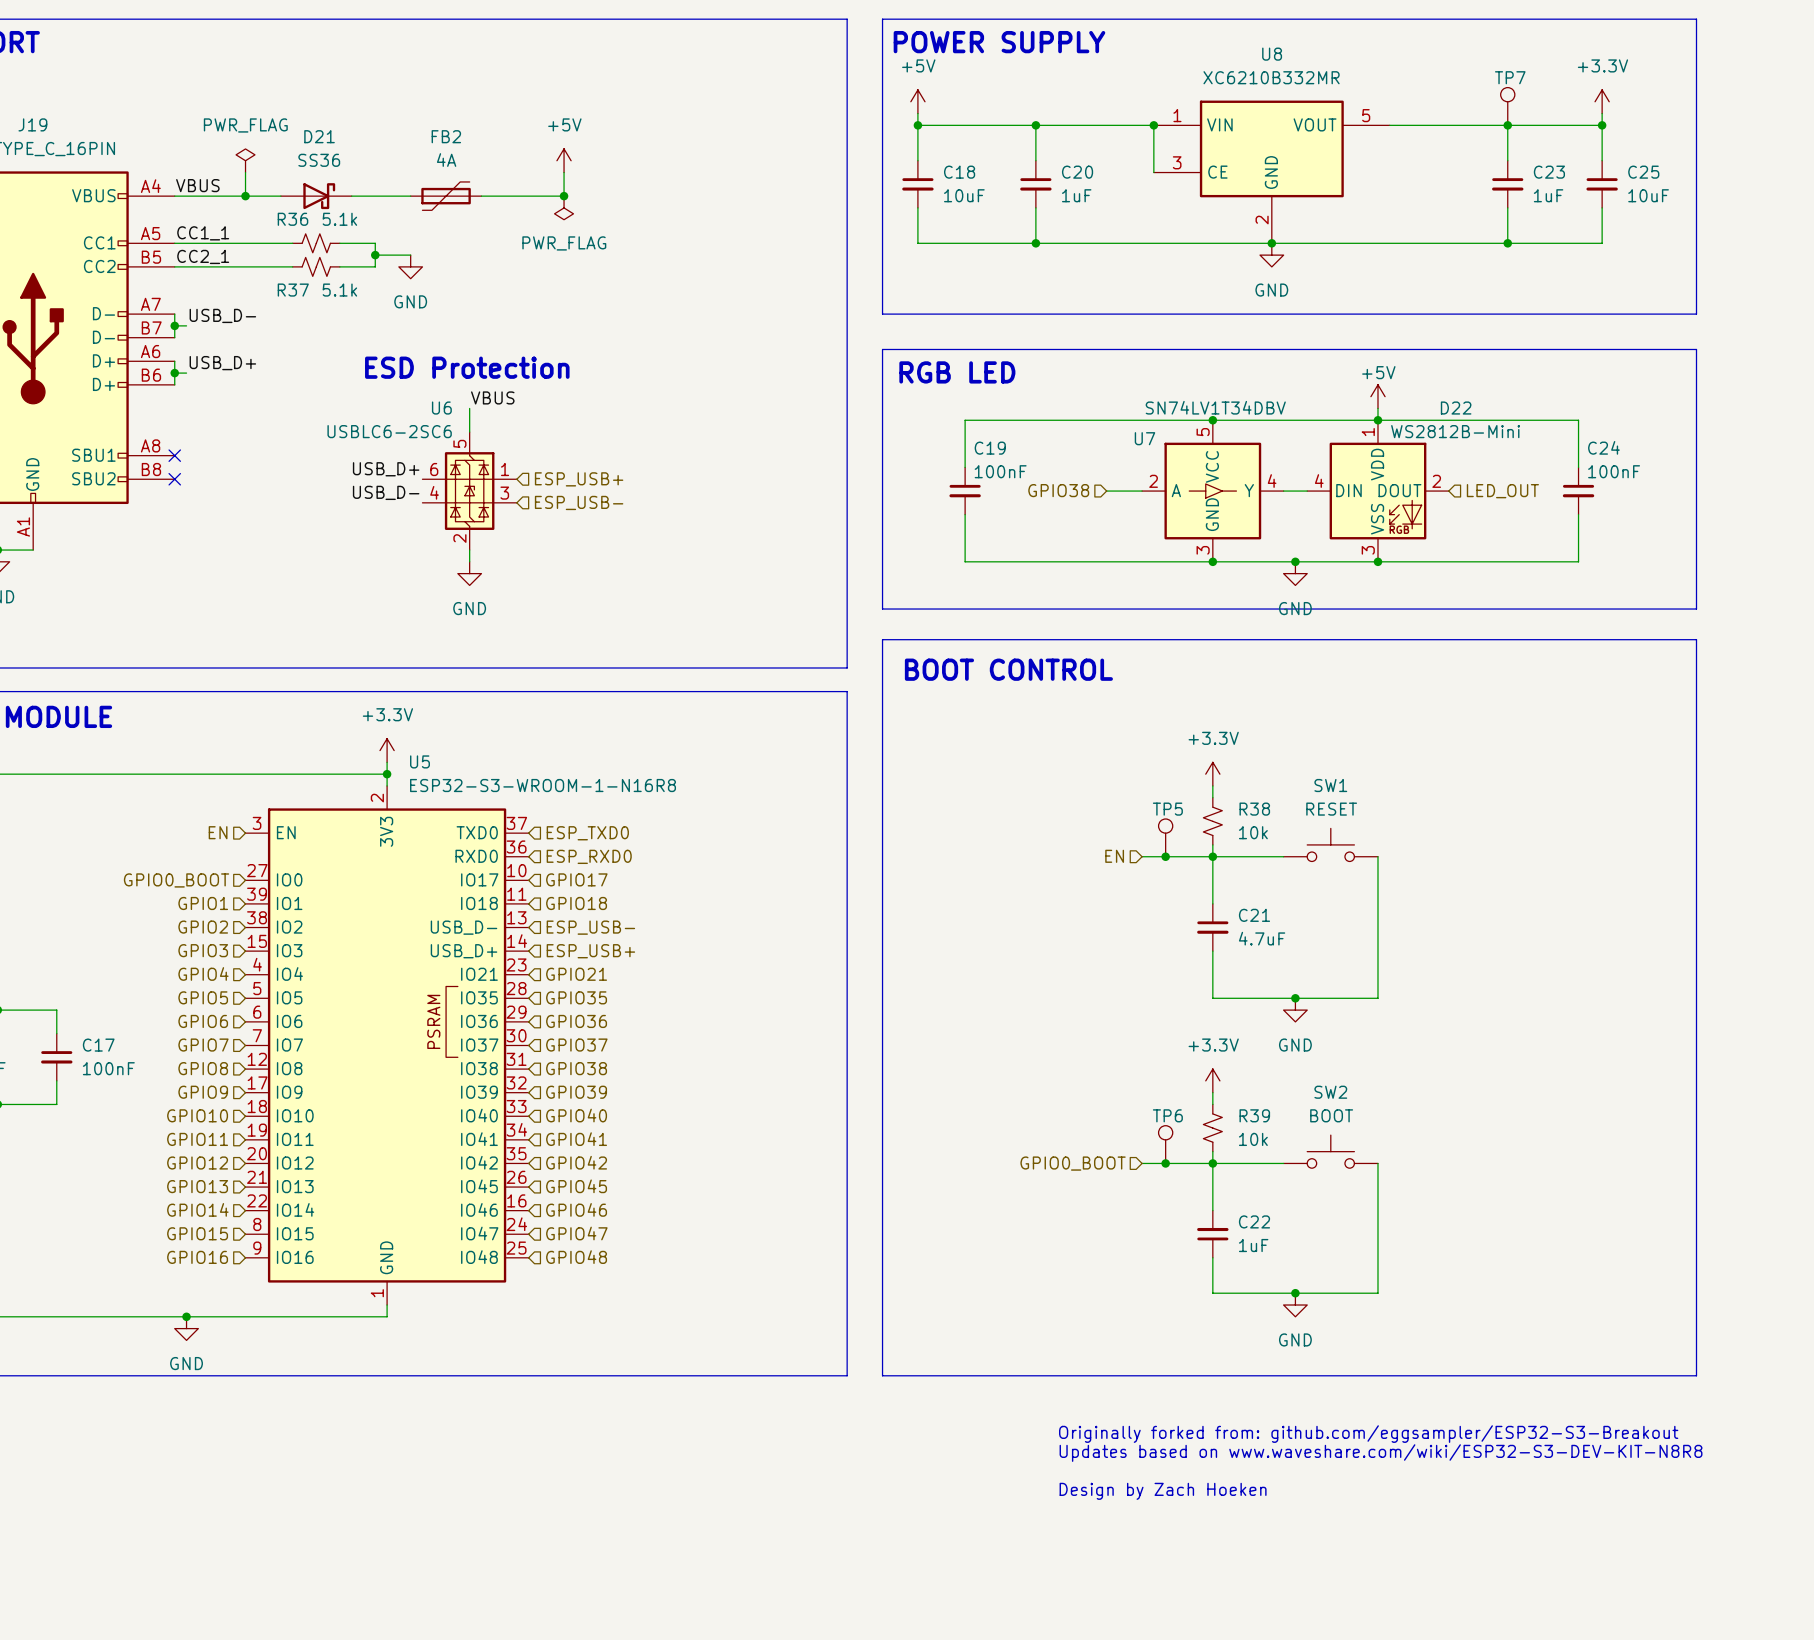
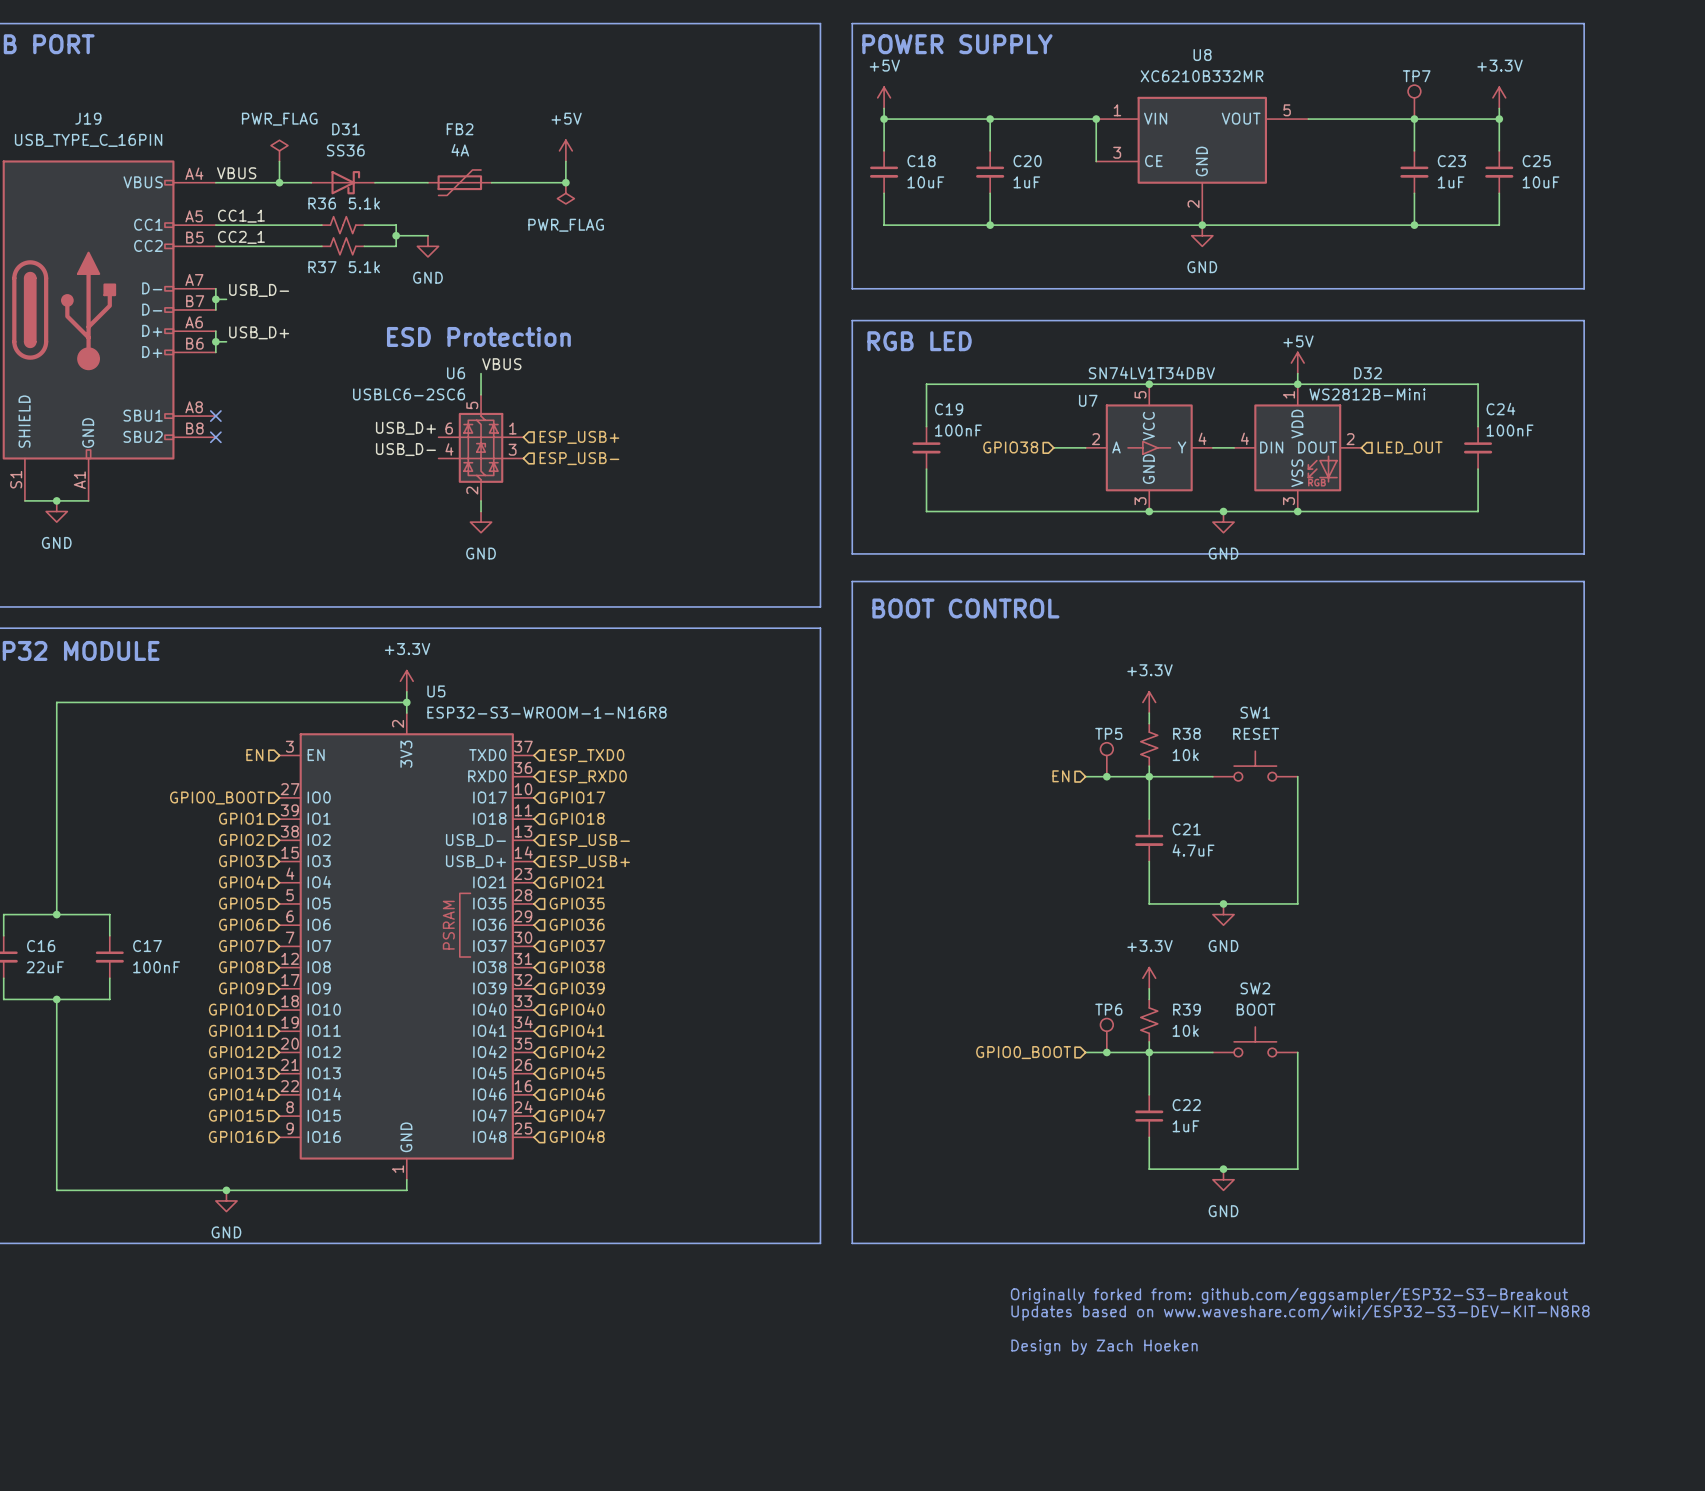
D21 name: D21 (319, 136) -> D31 (346, 129)
D22 name: D22 (1456, 408) -> D32 (1368, 373)

